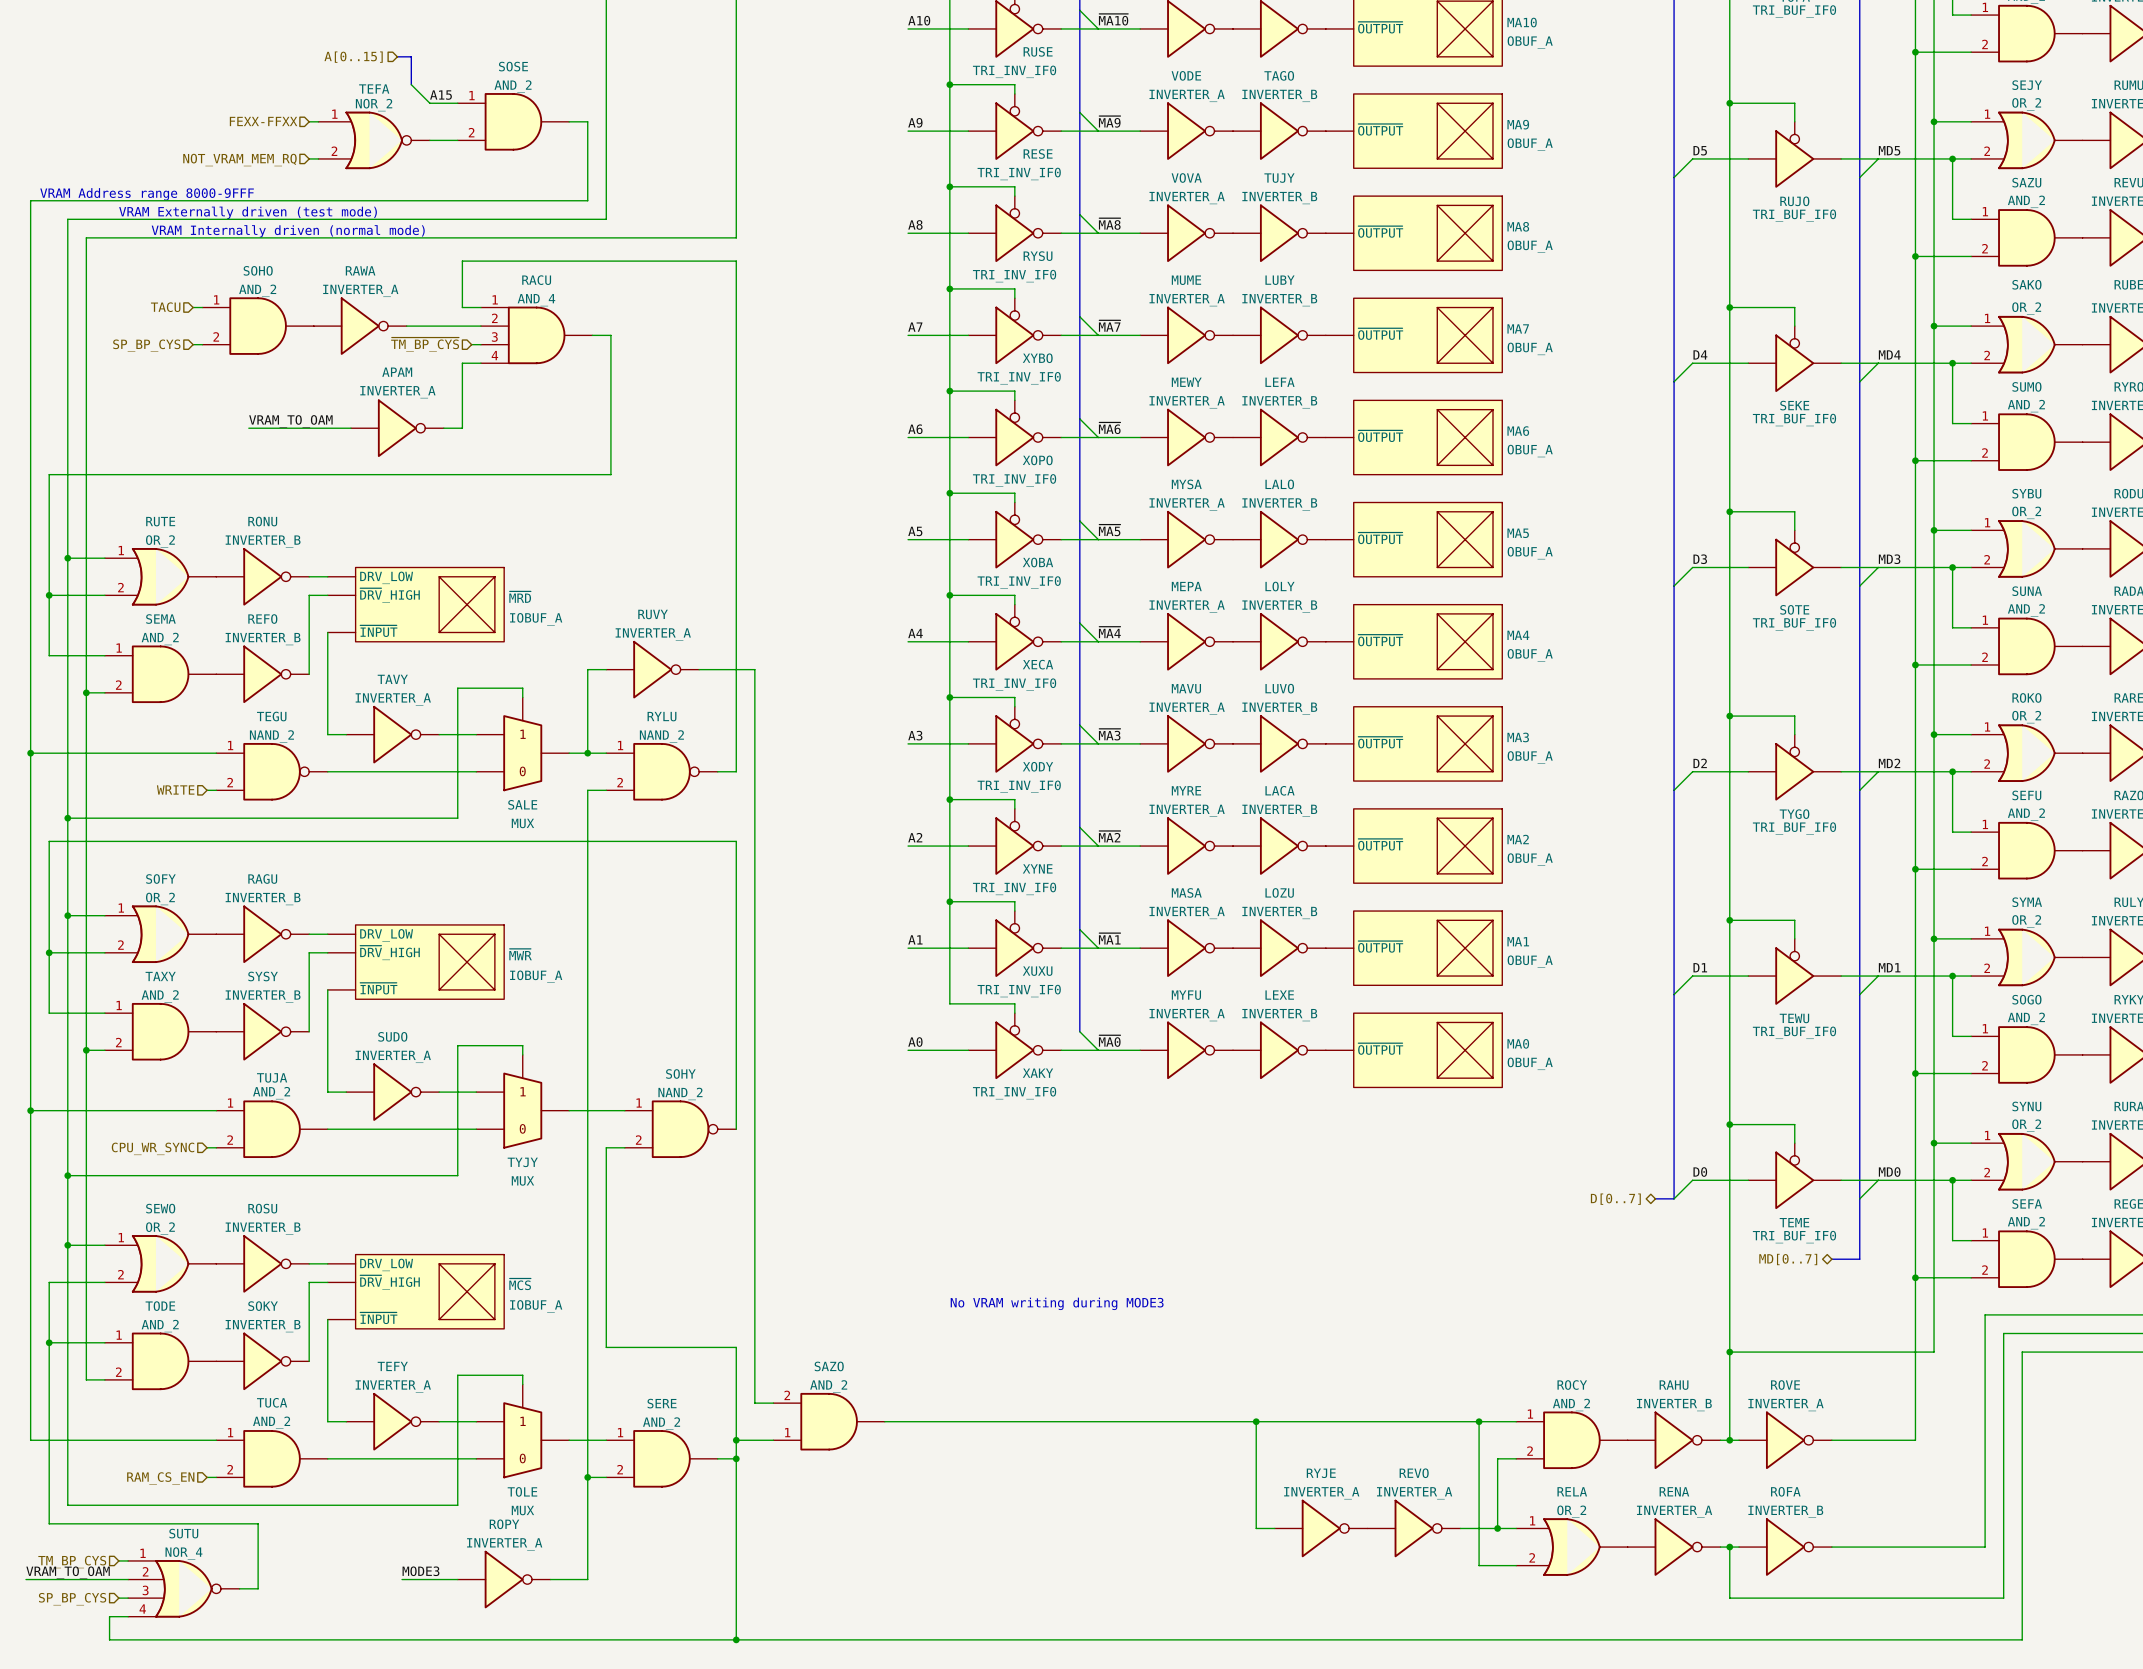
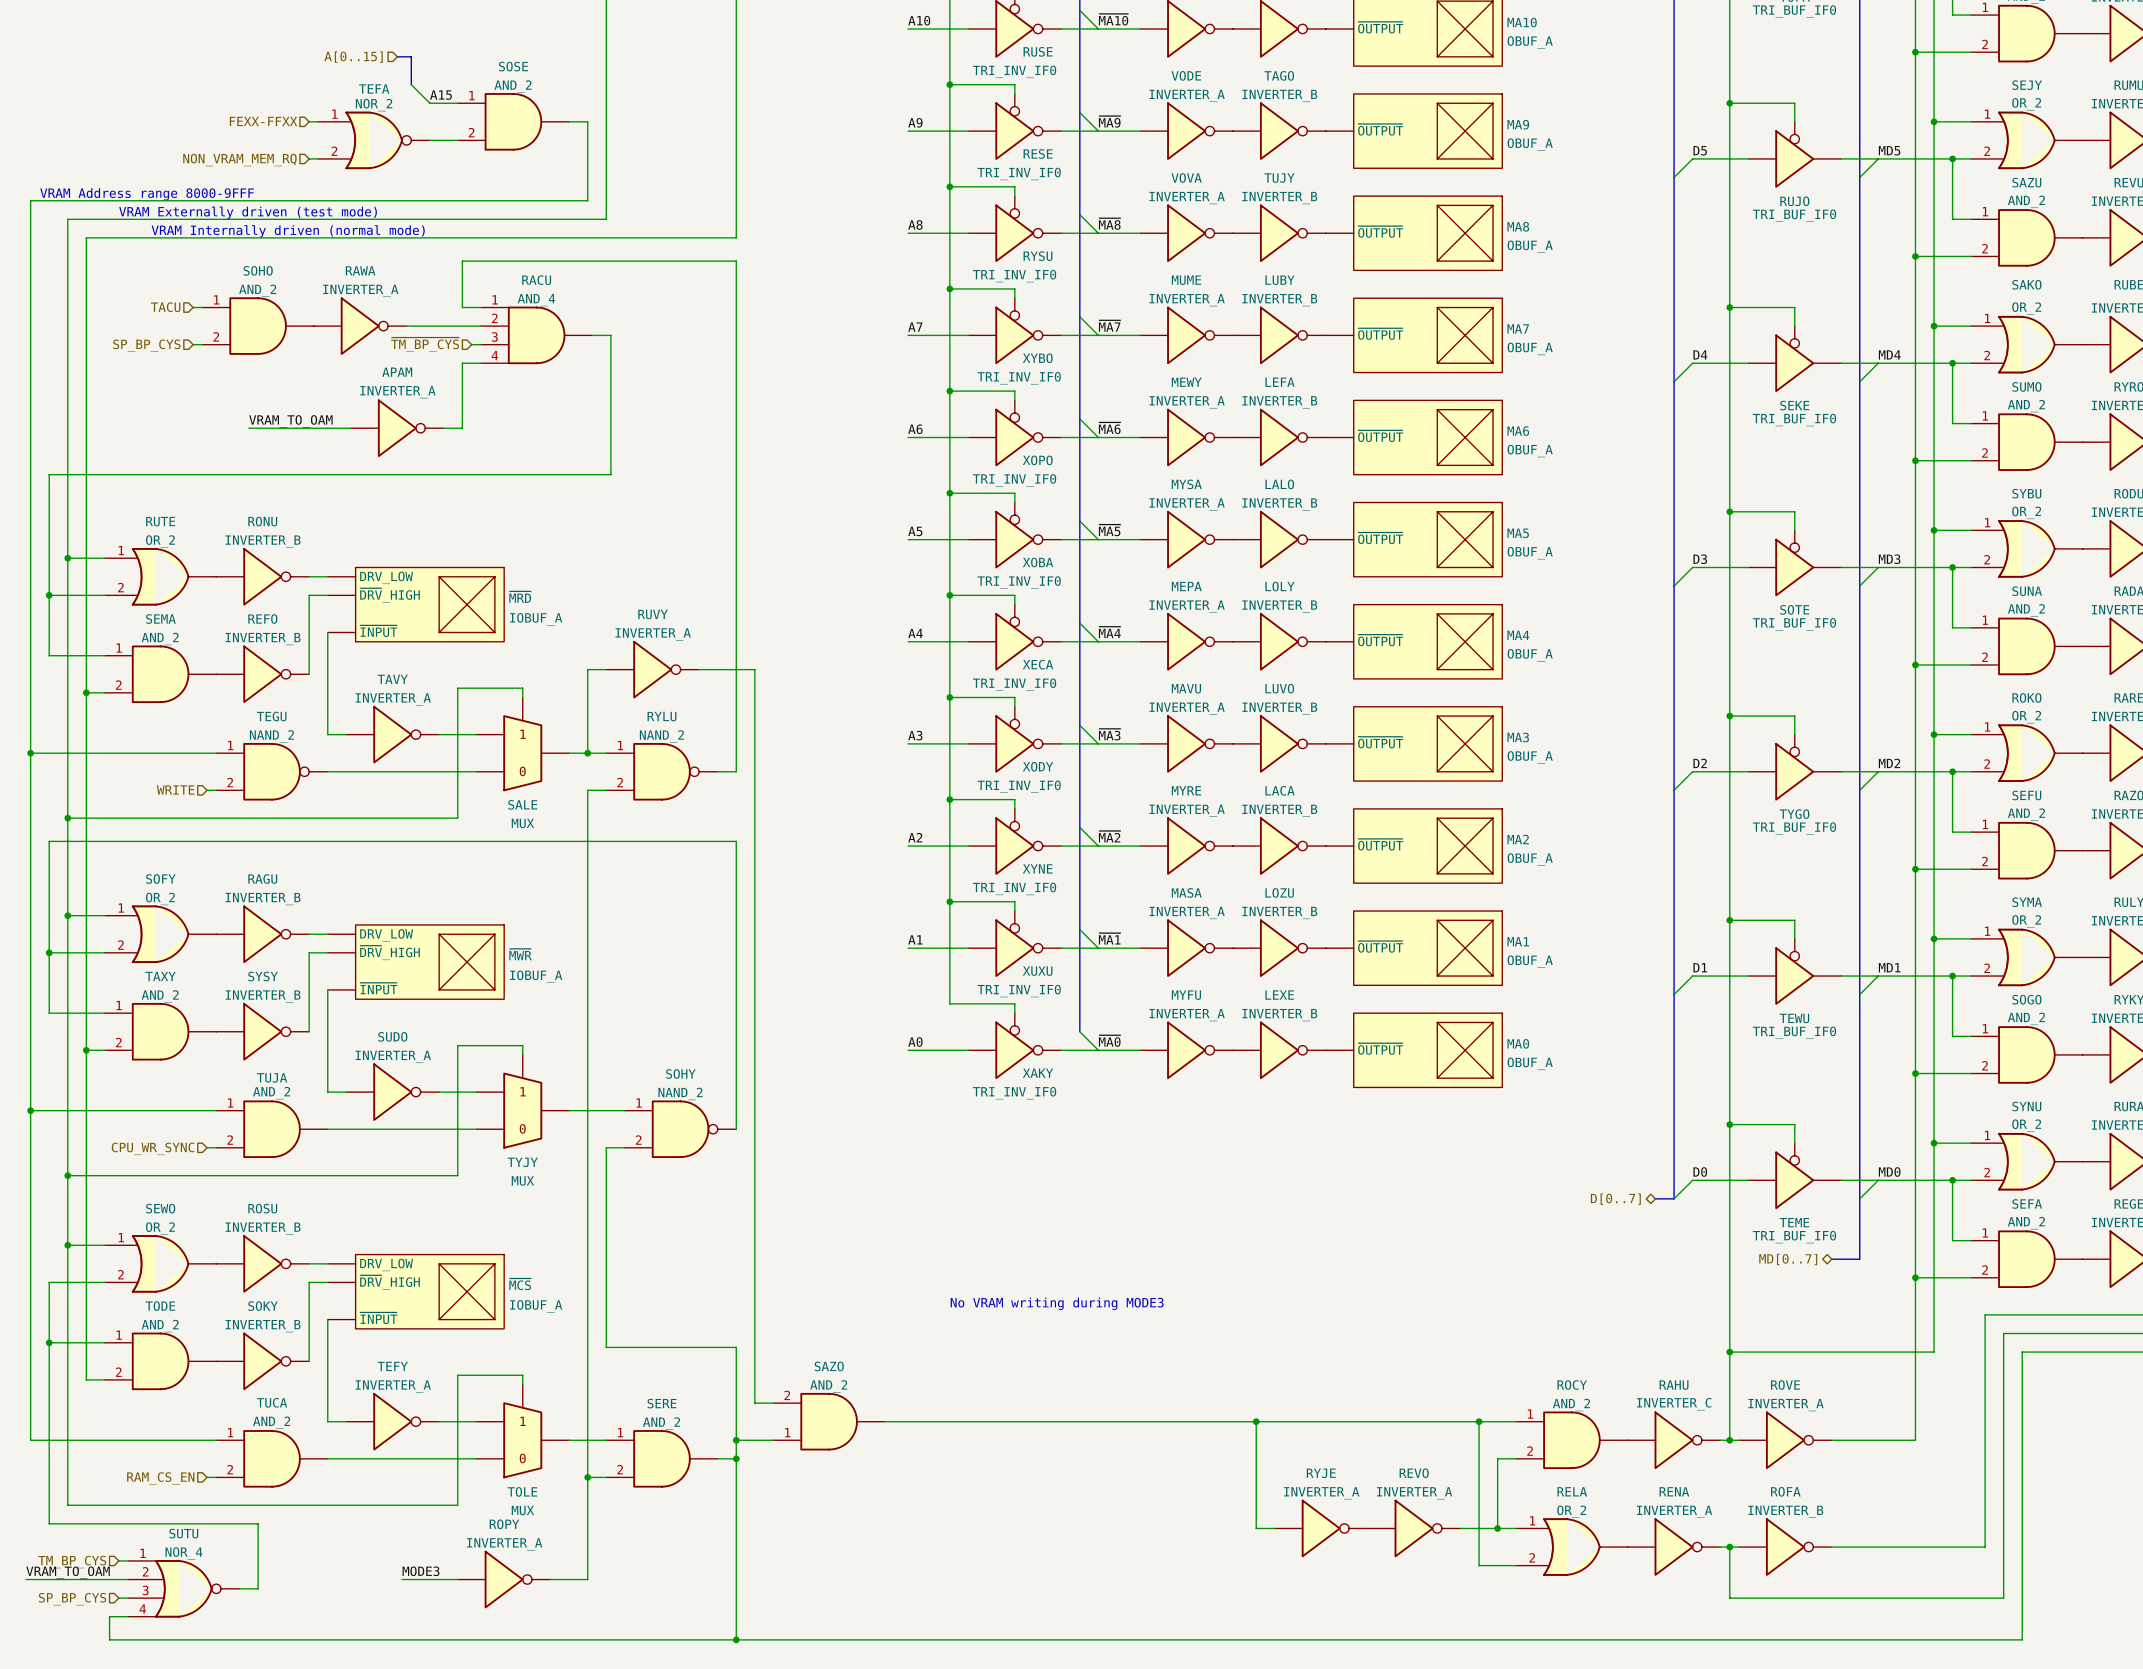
hierarchical label: NOT_VRAM_MEM_RQ (239, 160) -> NON_VRAM_MEM_RQ (239, 160)
RAHU value: INVERTER_B (1674, 1405) -> INVERTER_C (1674, 1404)

